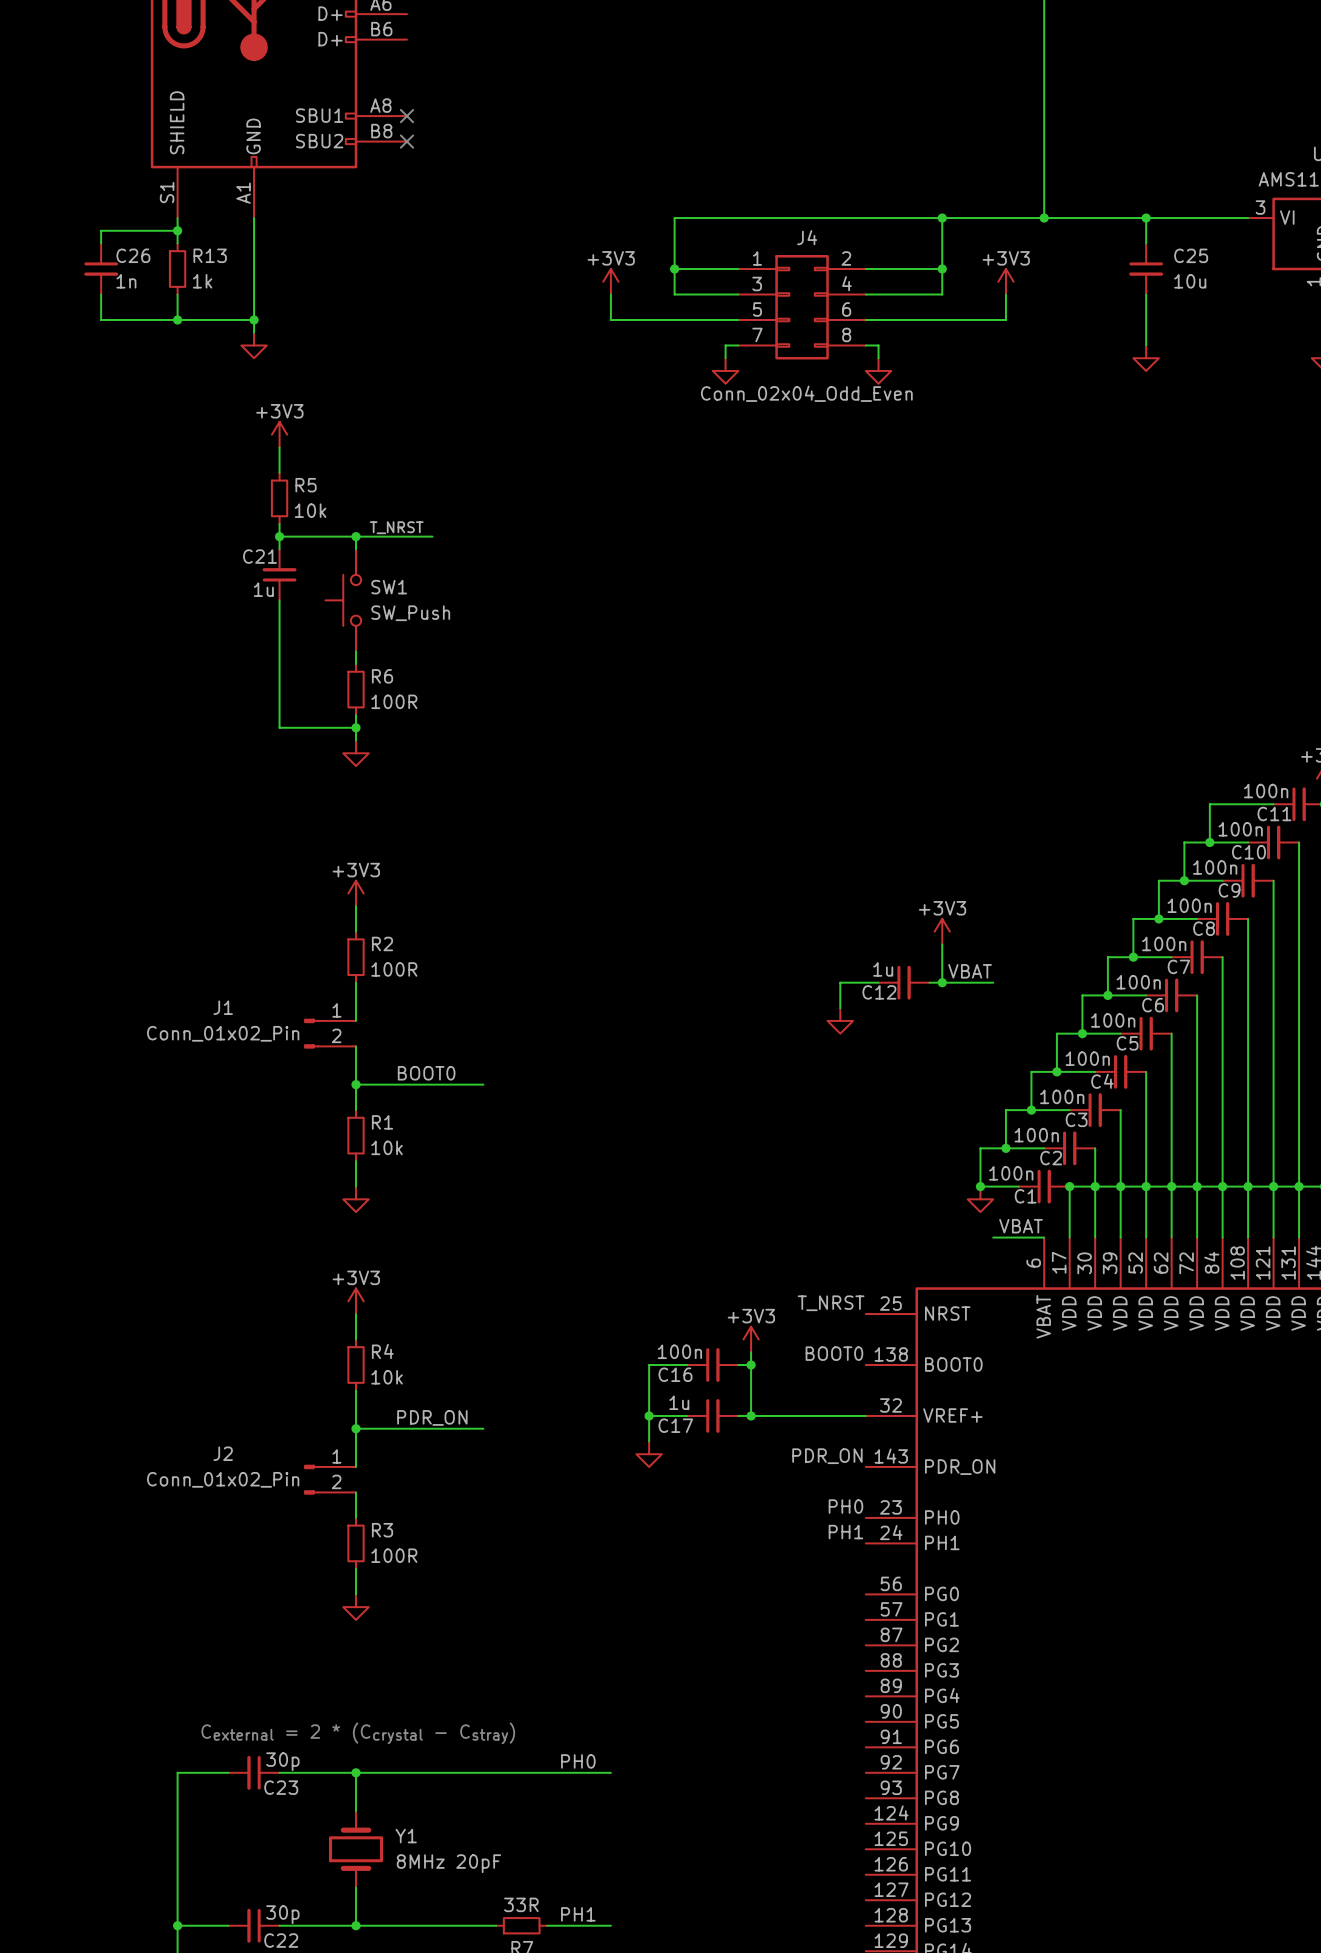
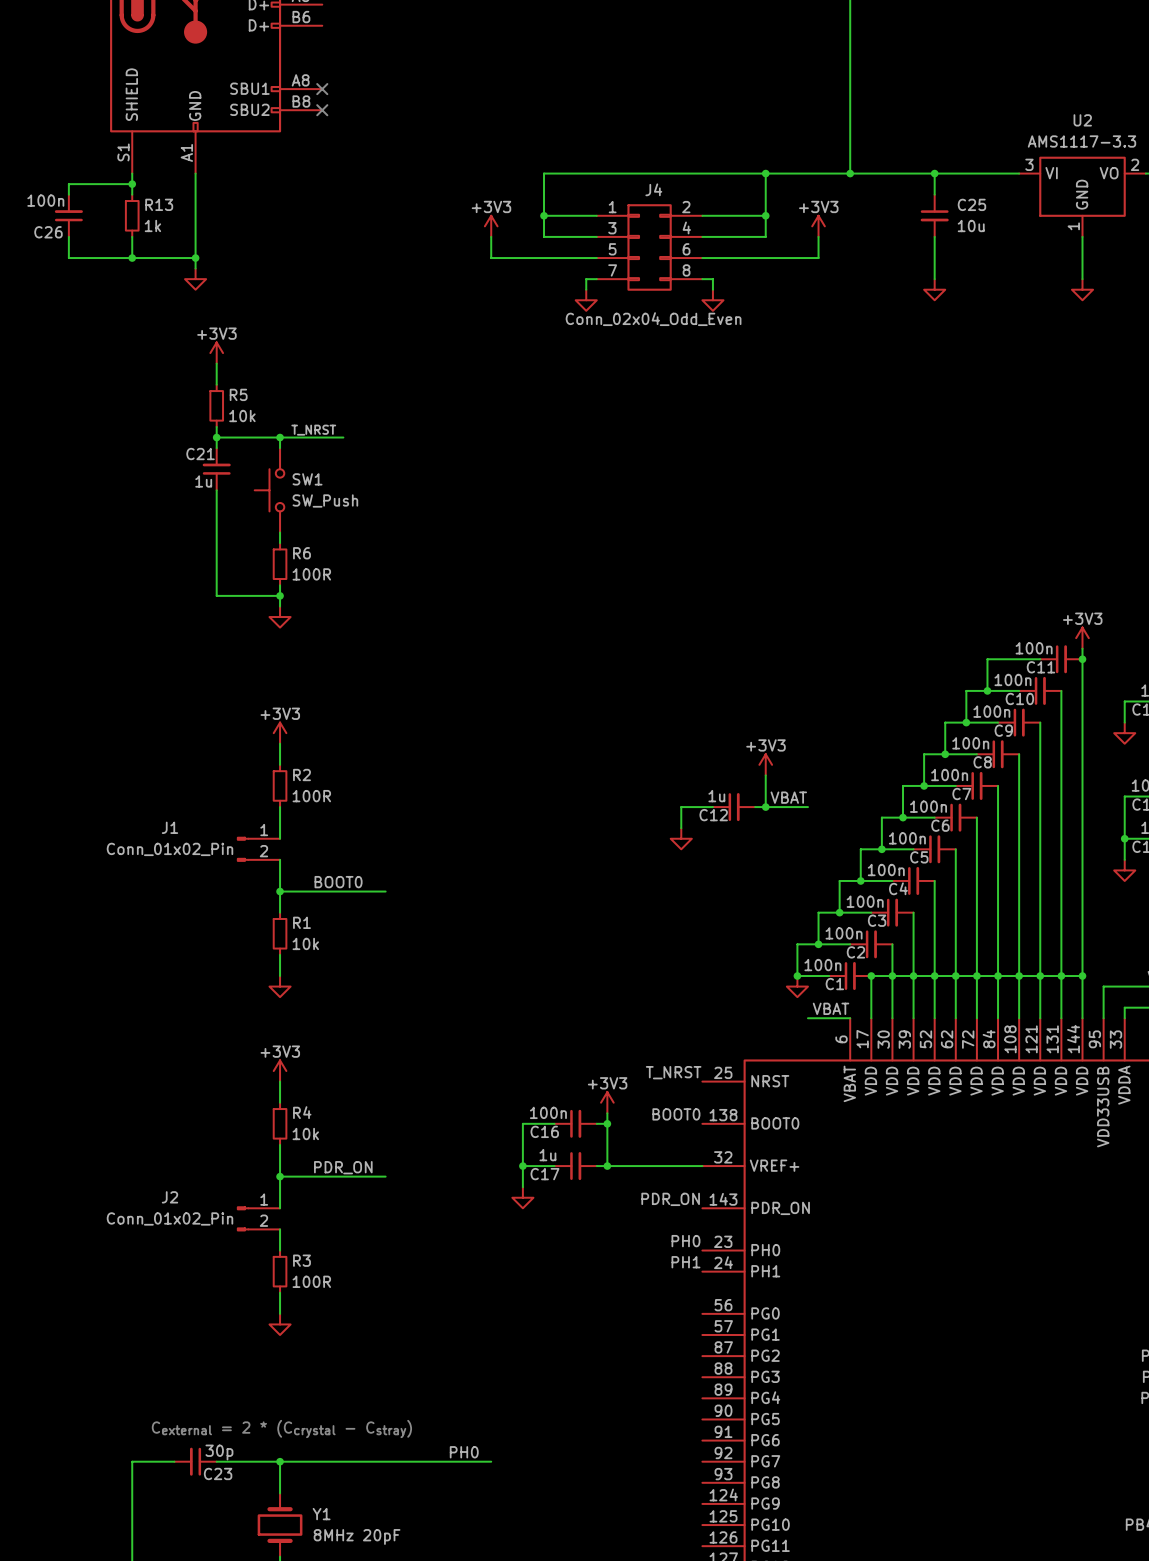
C26 rotation: 0° (101, 269) -> 180° (68, 215)
C26 value: 1n (126, 281) -> 100n (45, 200)

